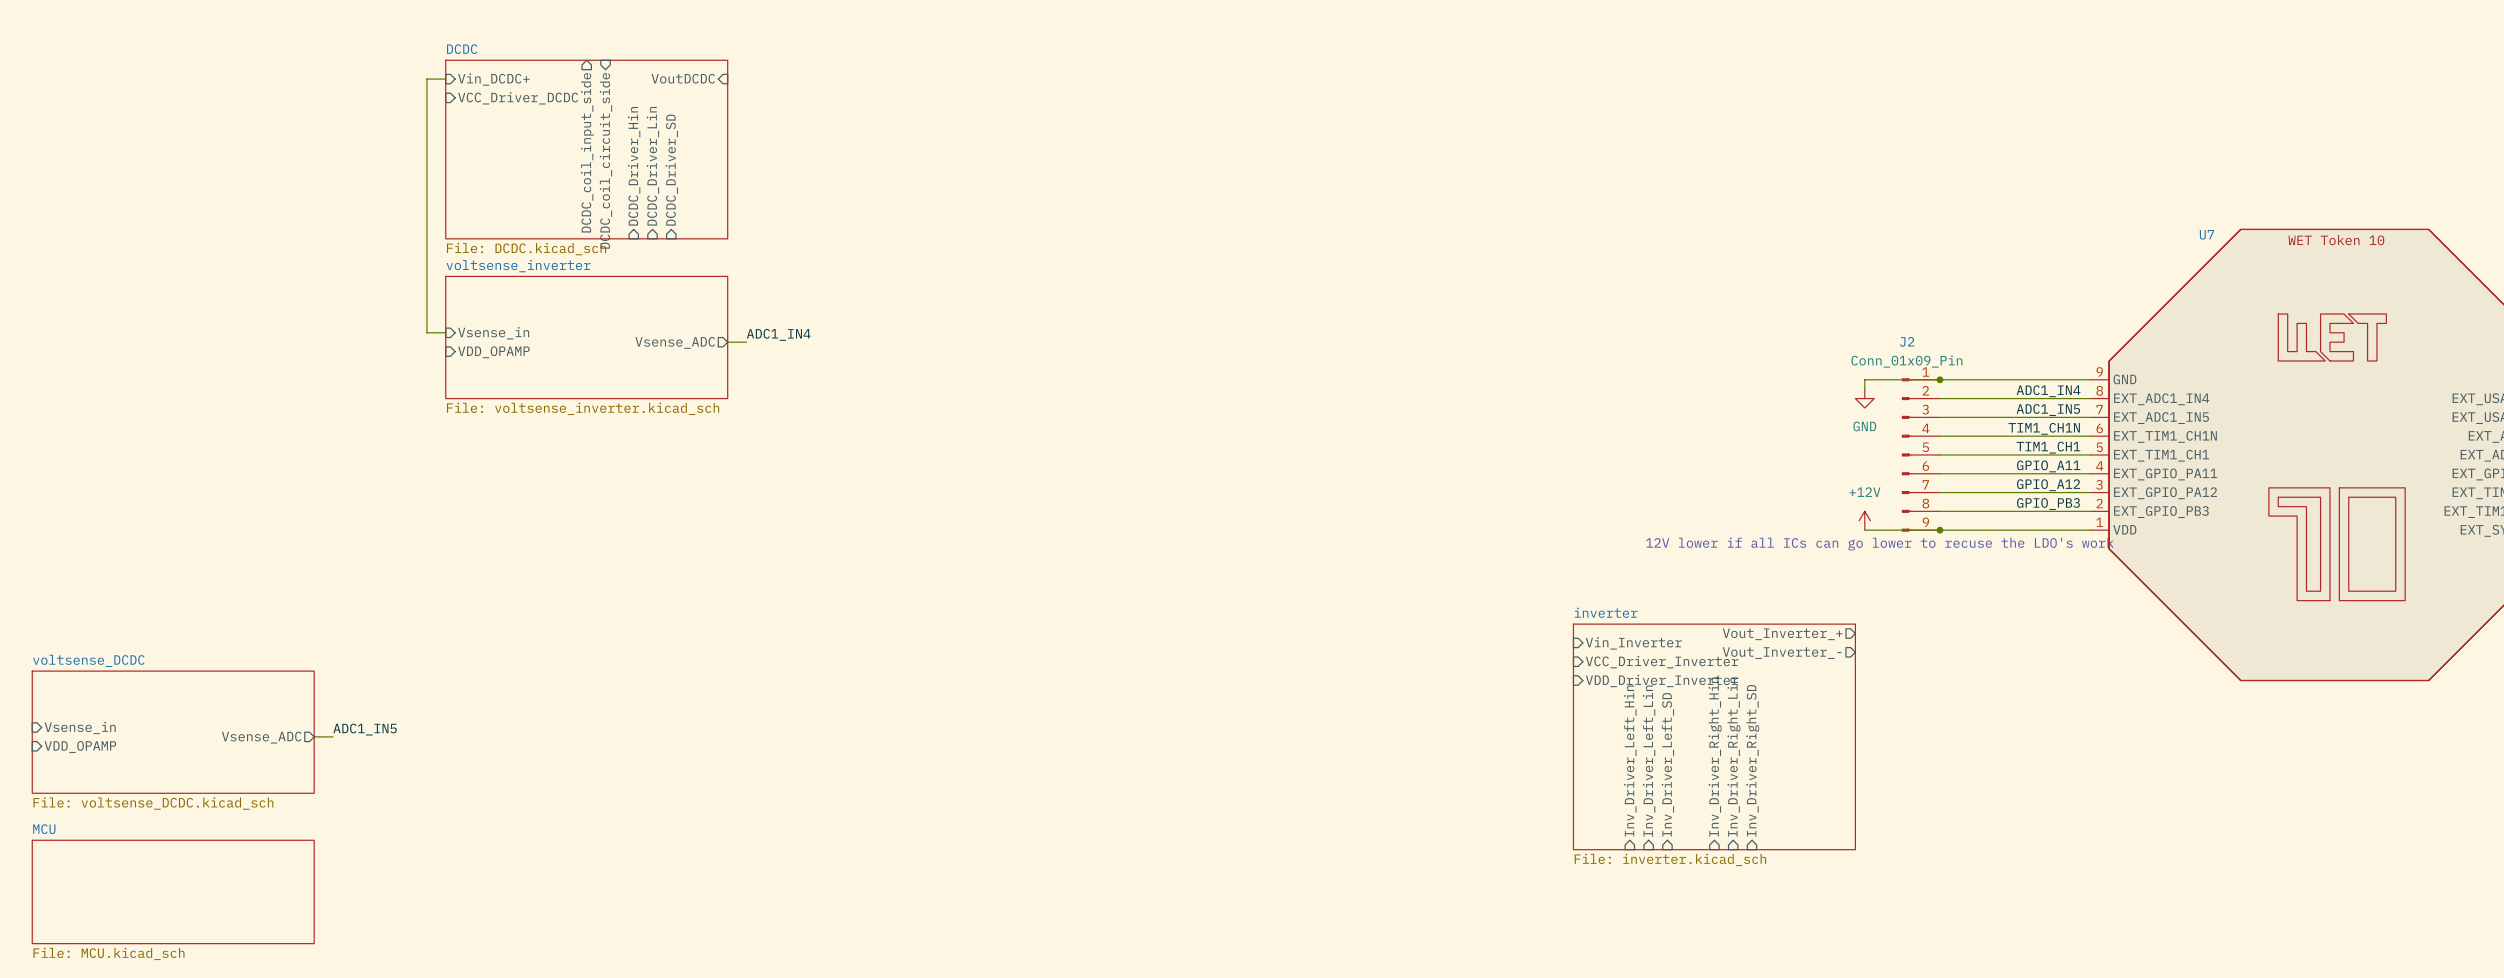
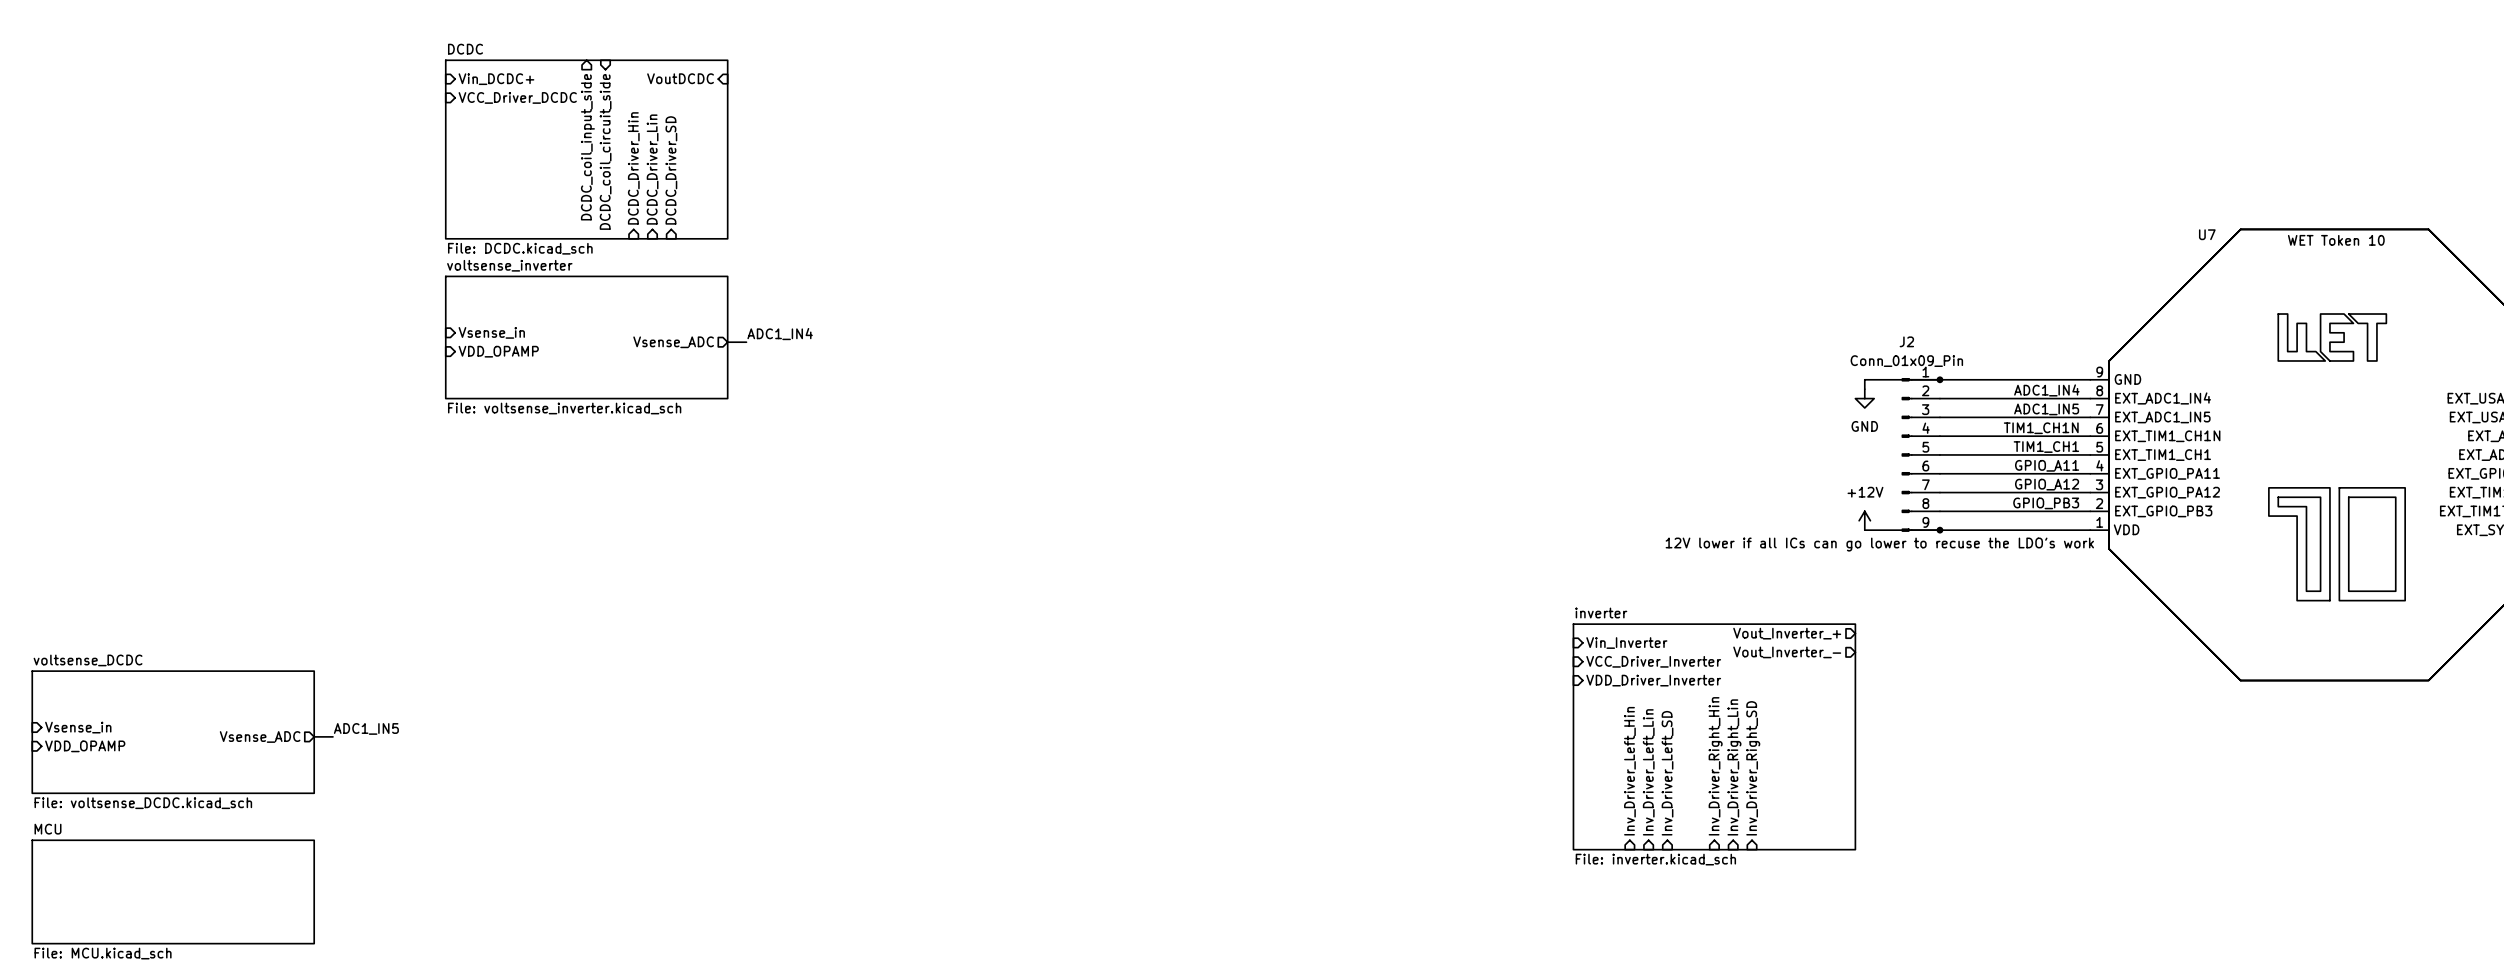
wire: (445, 79) (426, 79) (426, 332) (445, 332) -> none

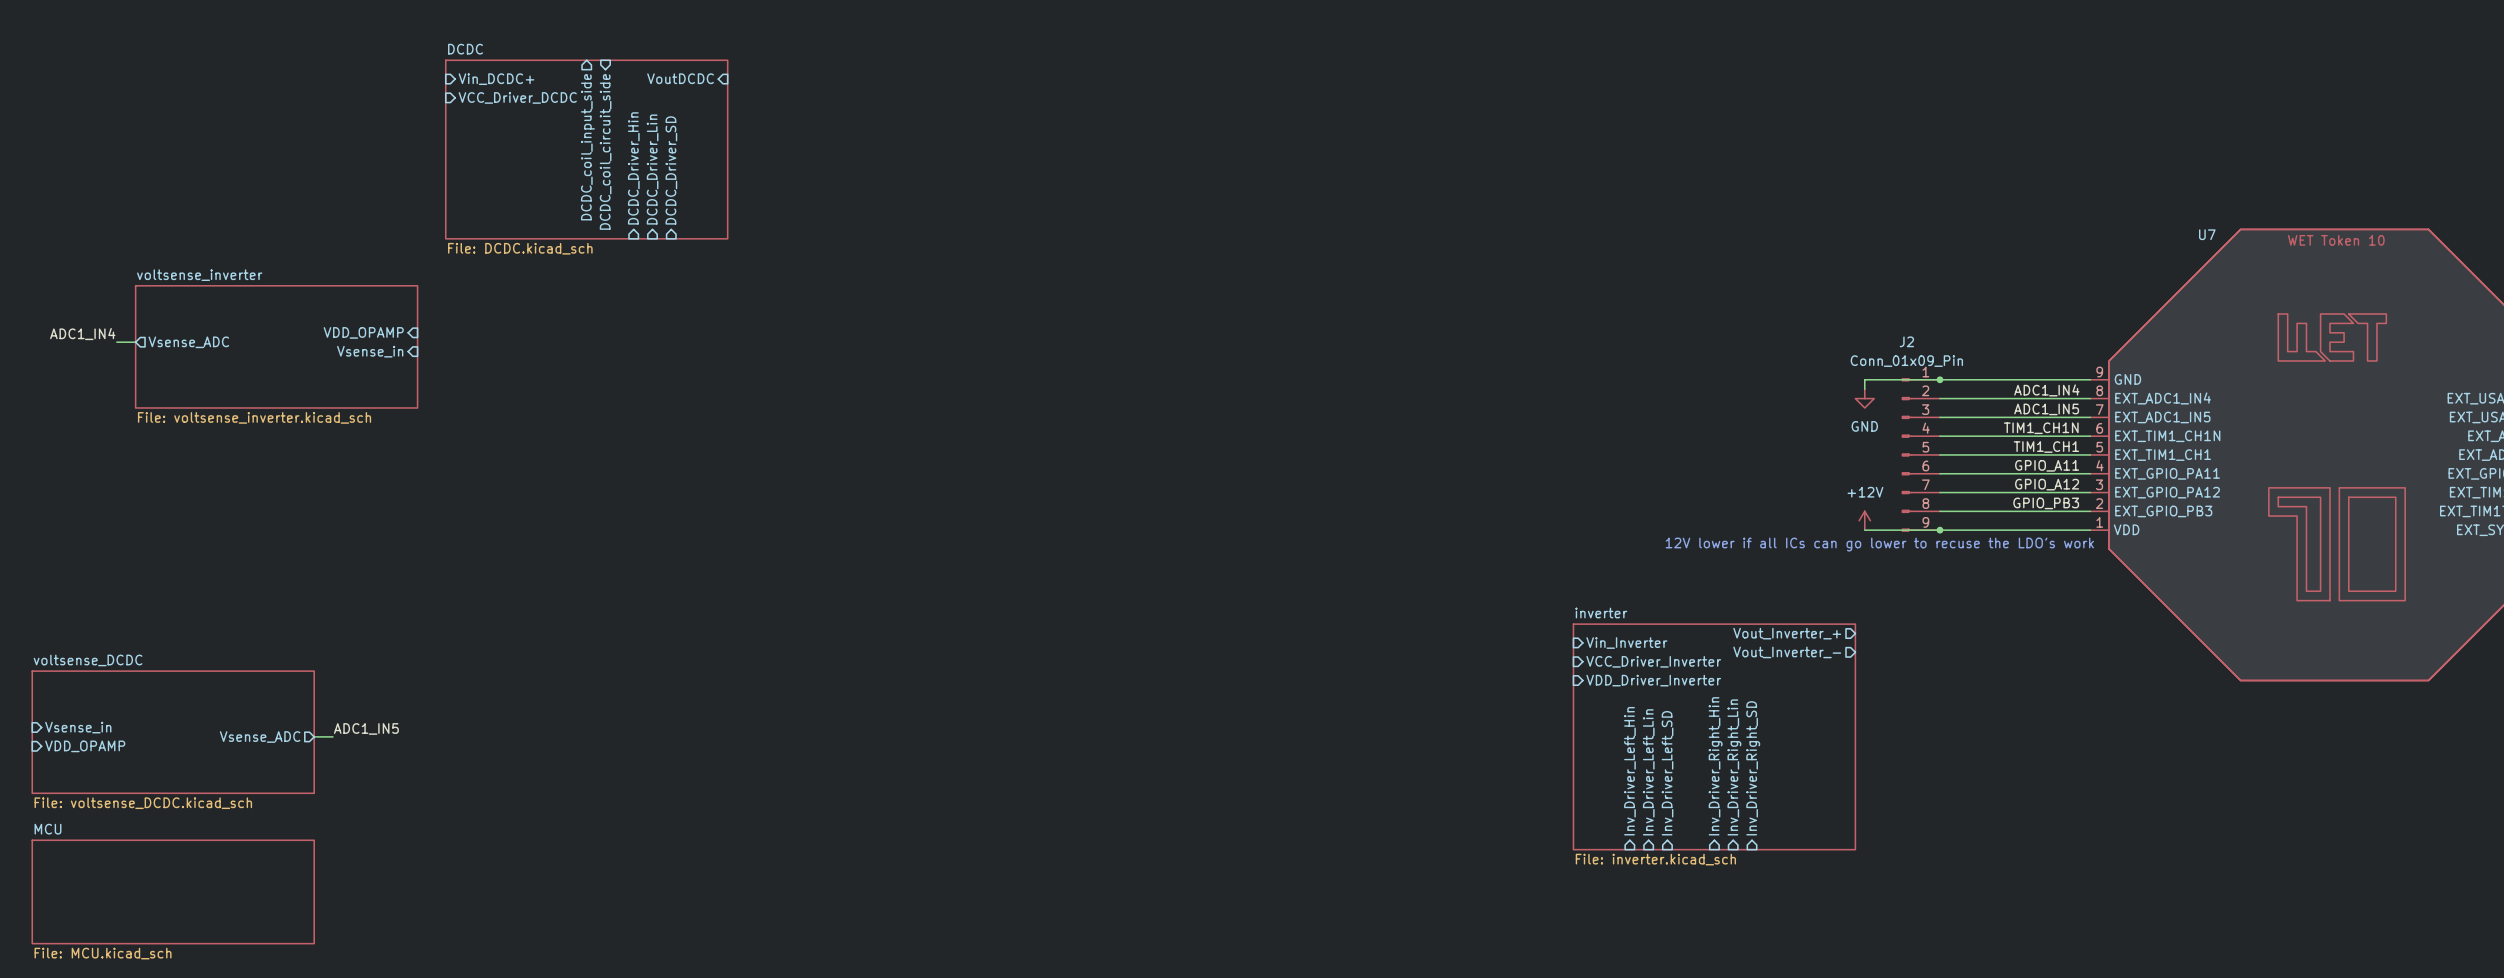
sheet pin rotation: 0° (491, 332) -> 180° (370, 351)
sheet pin position: Vsense_in (491, 332) -> Vsense_in (370, 351)
label: none -> ADC1_IN4 (82, 334)
label: ADC1_IN4 (780, 334) -> none
sheet voltsense_inverter: File: voltsense_inverter.kicad_sch (586, 337) -> none
wire: none -> (116, 342) (135, 342)
sheet pin: none -> Vsense_ADC (188, 342)
sheet pin: Vsense_ADC (673, 342) -> none
wire: (727, 342) (746, 342) -> none
sheet voltsense_inverter: none -> File: voltsense_inverter.kicad_sch (276, 346)
sheet pin rotation: 0° (498, 351) -> 180° (363, 332)
sheet pin position: VDD_OPAMP (498, 351) -> VDD_OPAMP (363, 332)

